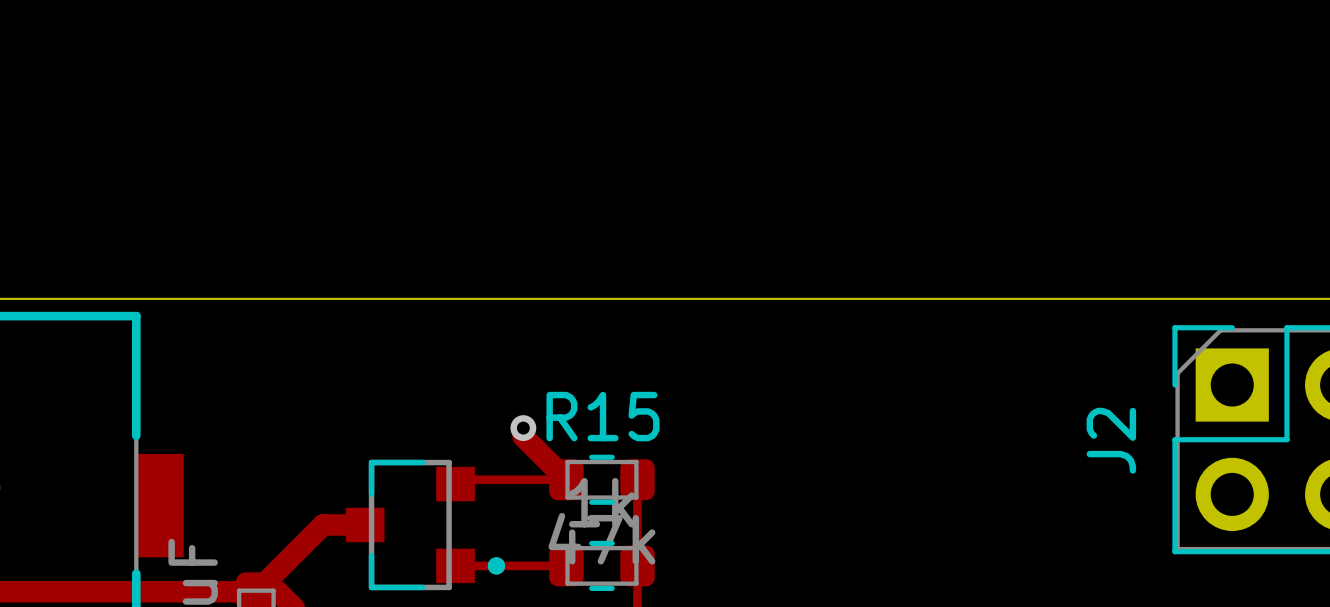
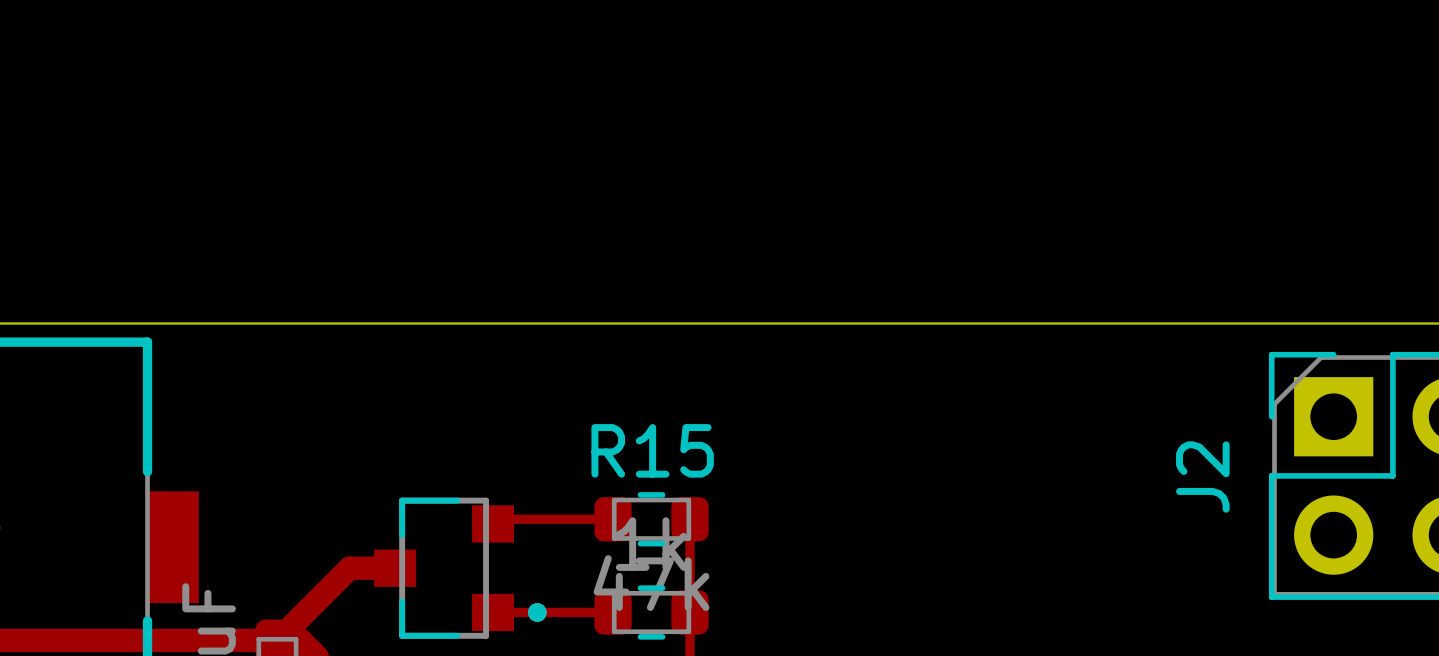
track: (523, 428) (523, 436) (566, 479) -> none
via: (523, 428) -> none

